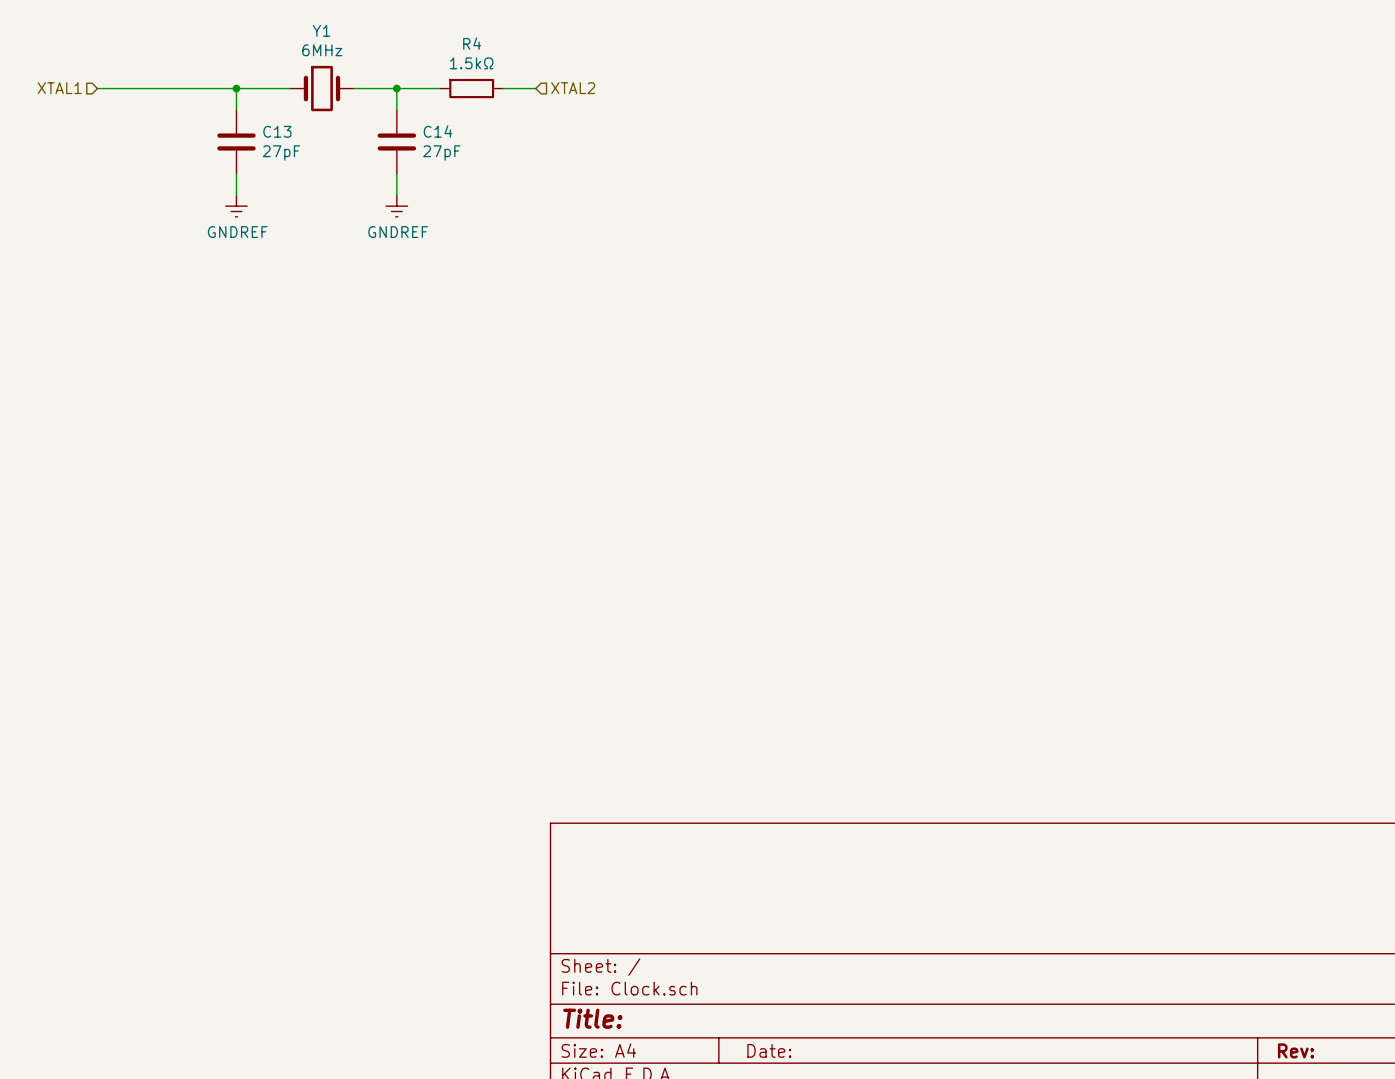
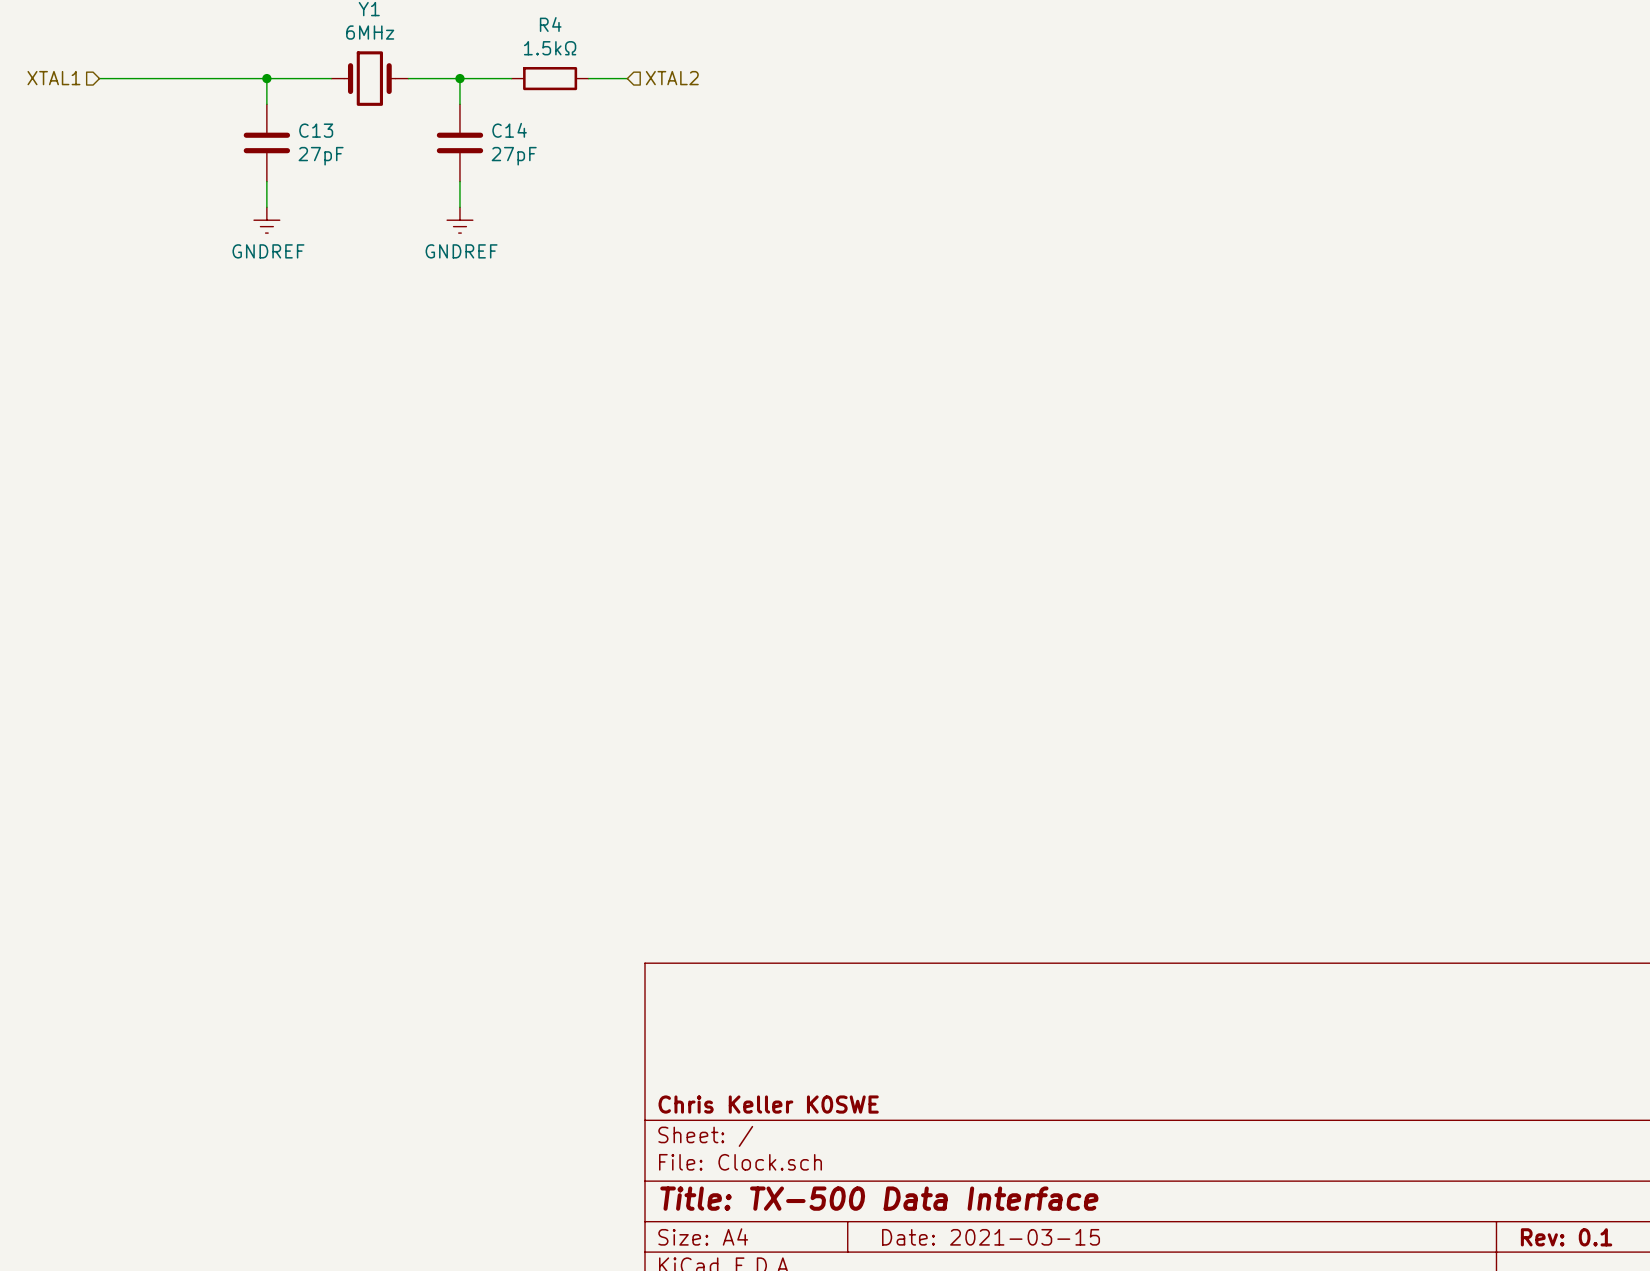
title block: none -> Chris Keller K0SWE (768, 1104)
title block: Title: (592, 1018) -> Title: TX-500 Data Interface (879, 1198)
title block: Date: (769, 1050) -> Date: 2021-03-15 (991, 1237)
title block: Rev: (1295, 1050) -> Rev: 0.1 (1566, 1237)

